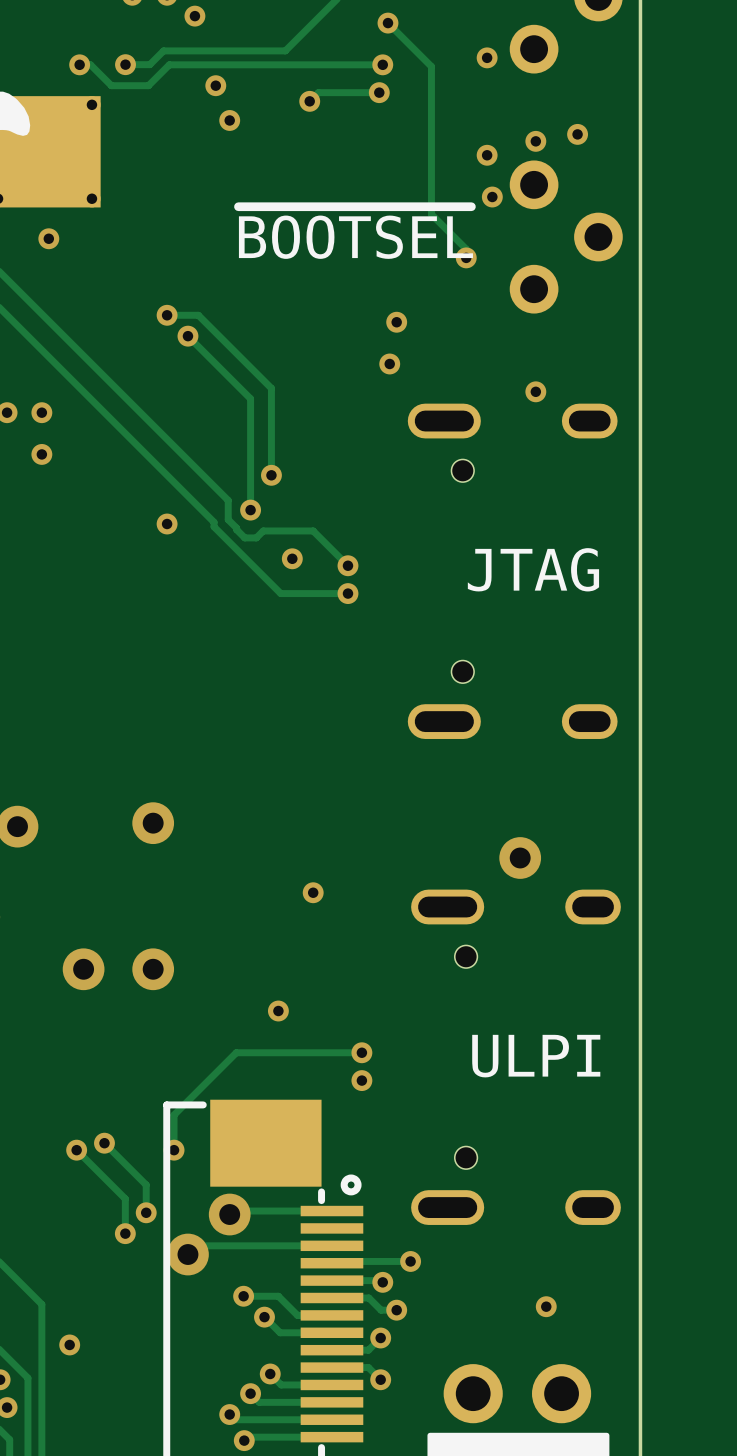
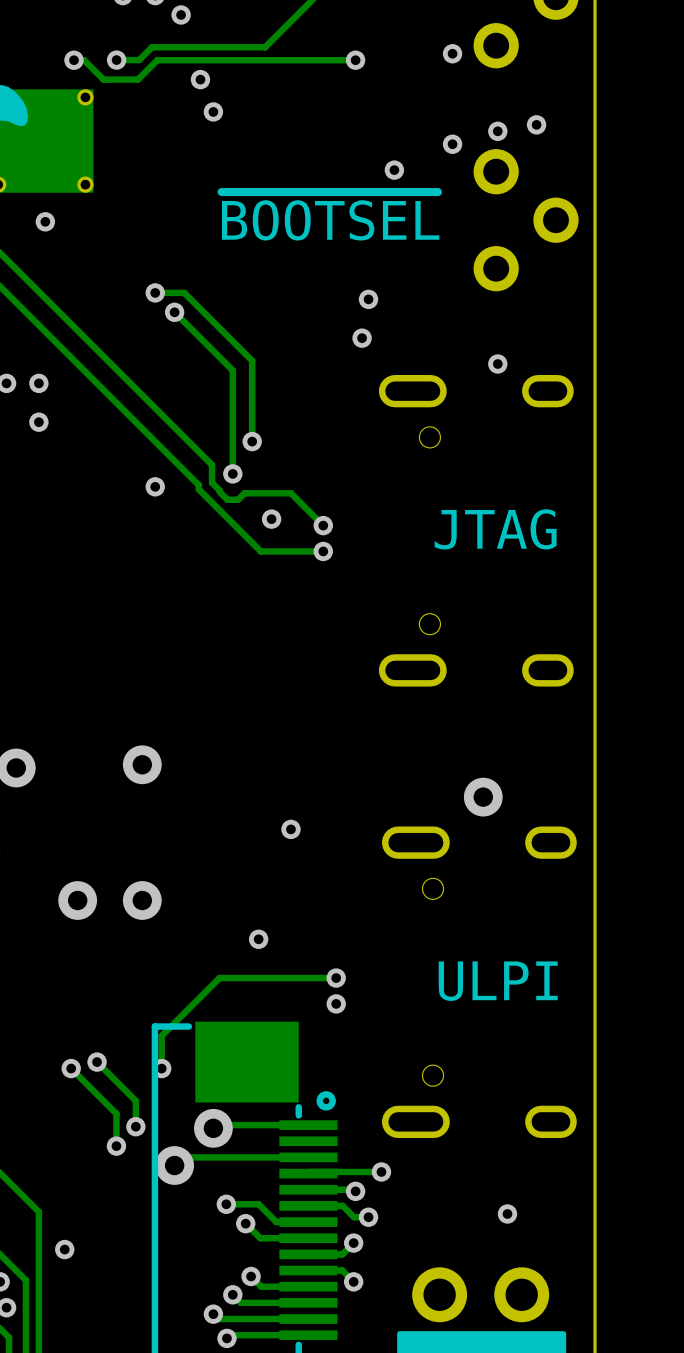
track: (387, 23) (431, 66) (431, 214) (466, 249) (466, 257) -> none
via: (387, 23) -> none
track: (379, 92) (318, 92) (309, 101) -> none
via: (379, 92) -> none
via: (309, 101) -> none
via: none -> (394, 170)
via: (492, 197) -> none
via: (466, 257) -> none

